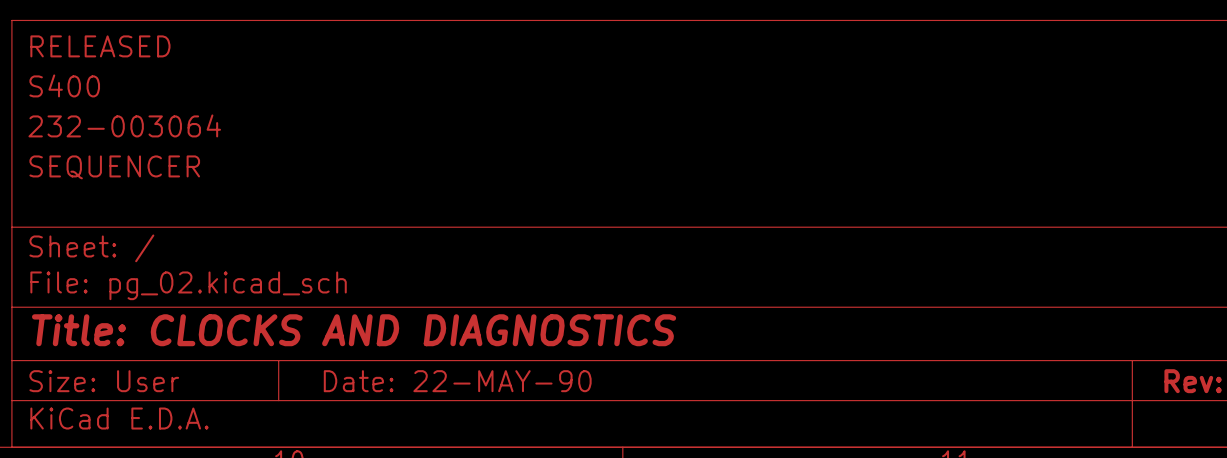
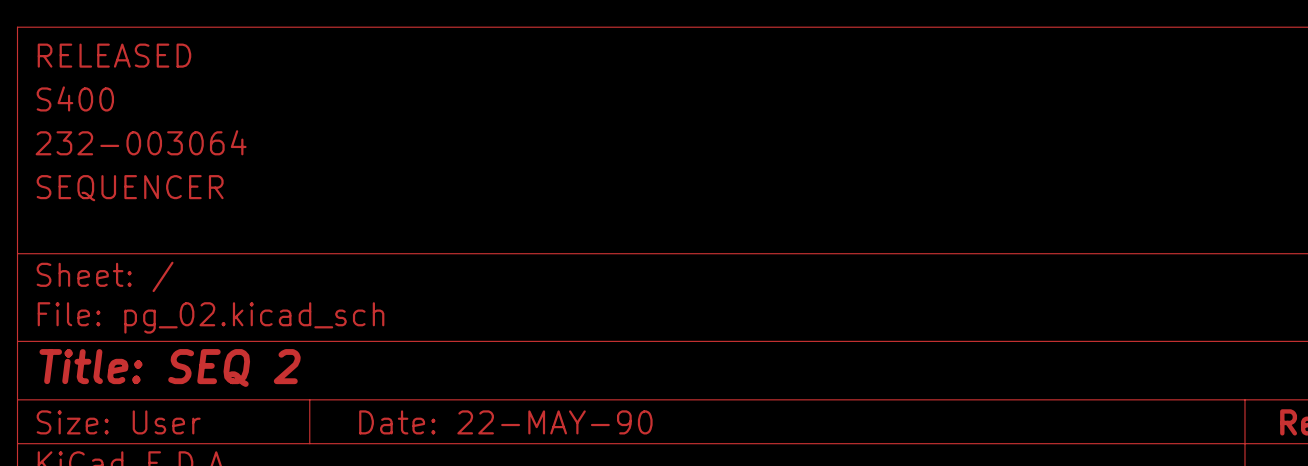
title block: Title: CLOCKS AND DIAGNOSTICS (354, 330) -> Title: SEQ 2 (170, 367)

